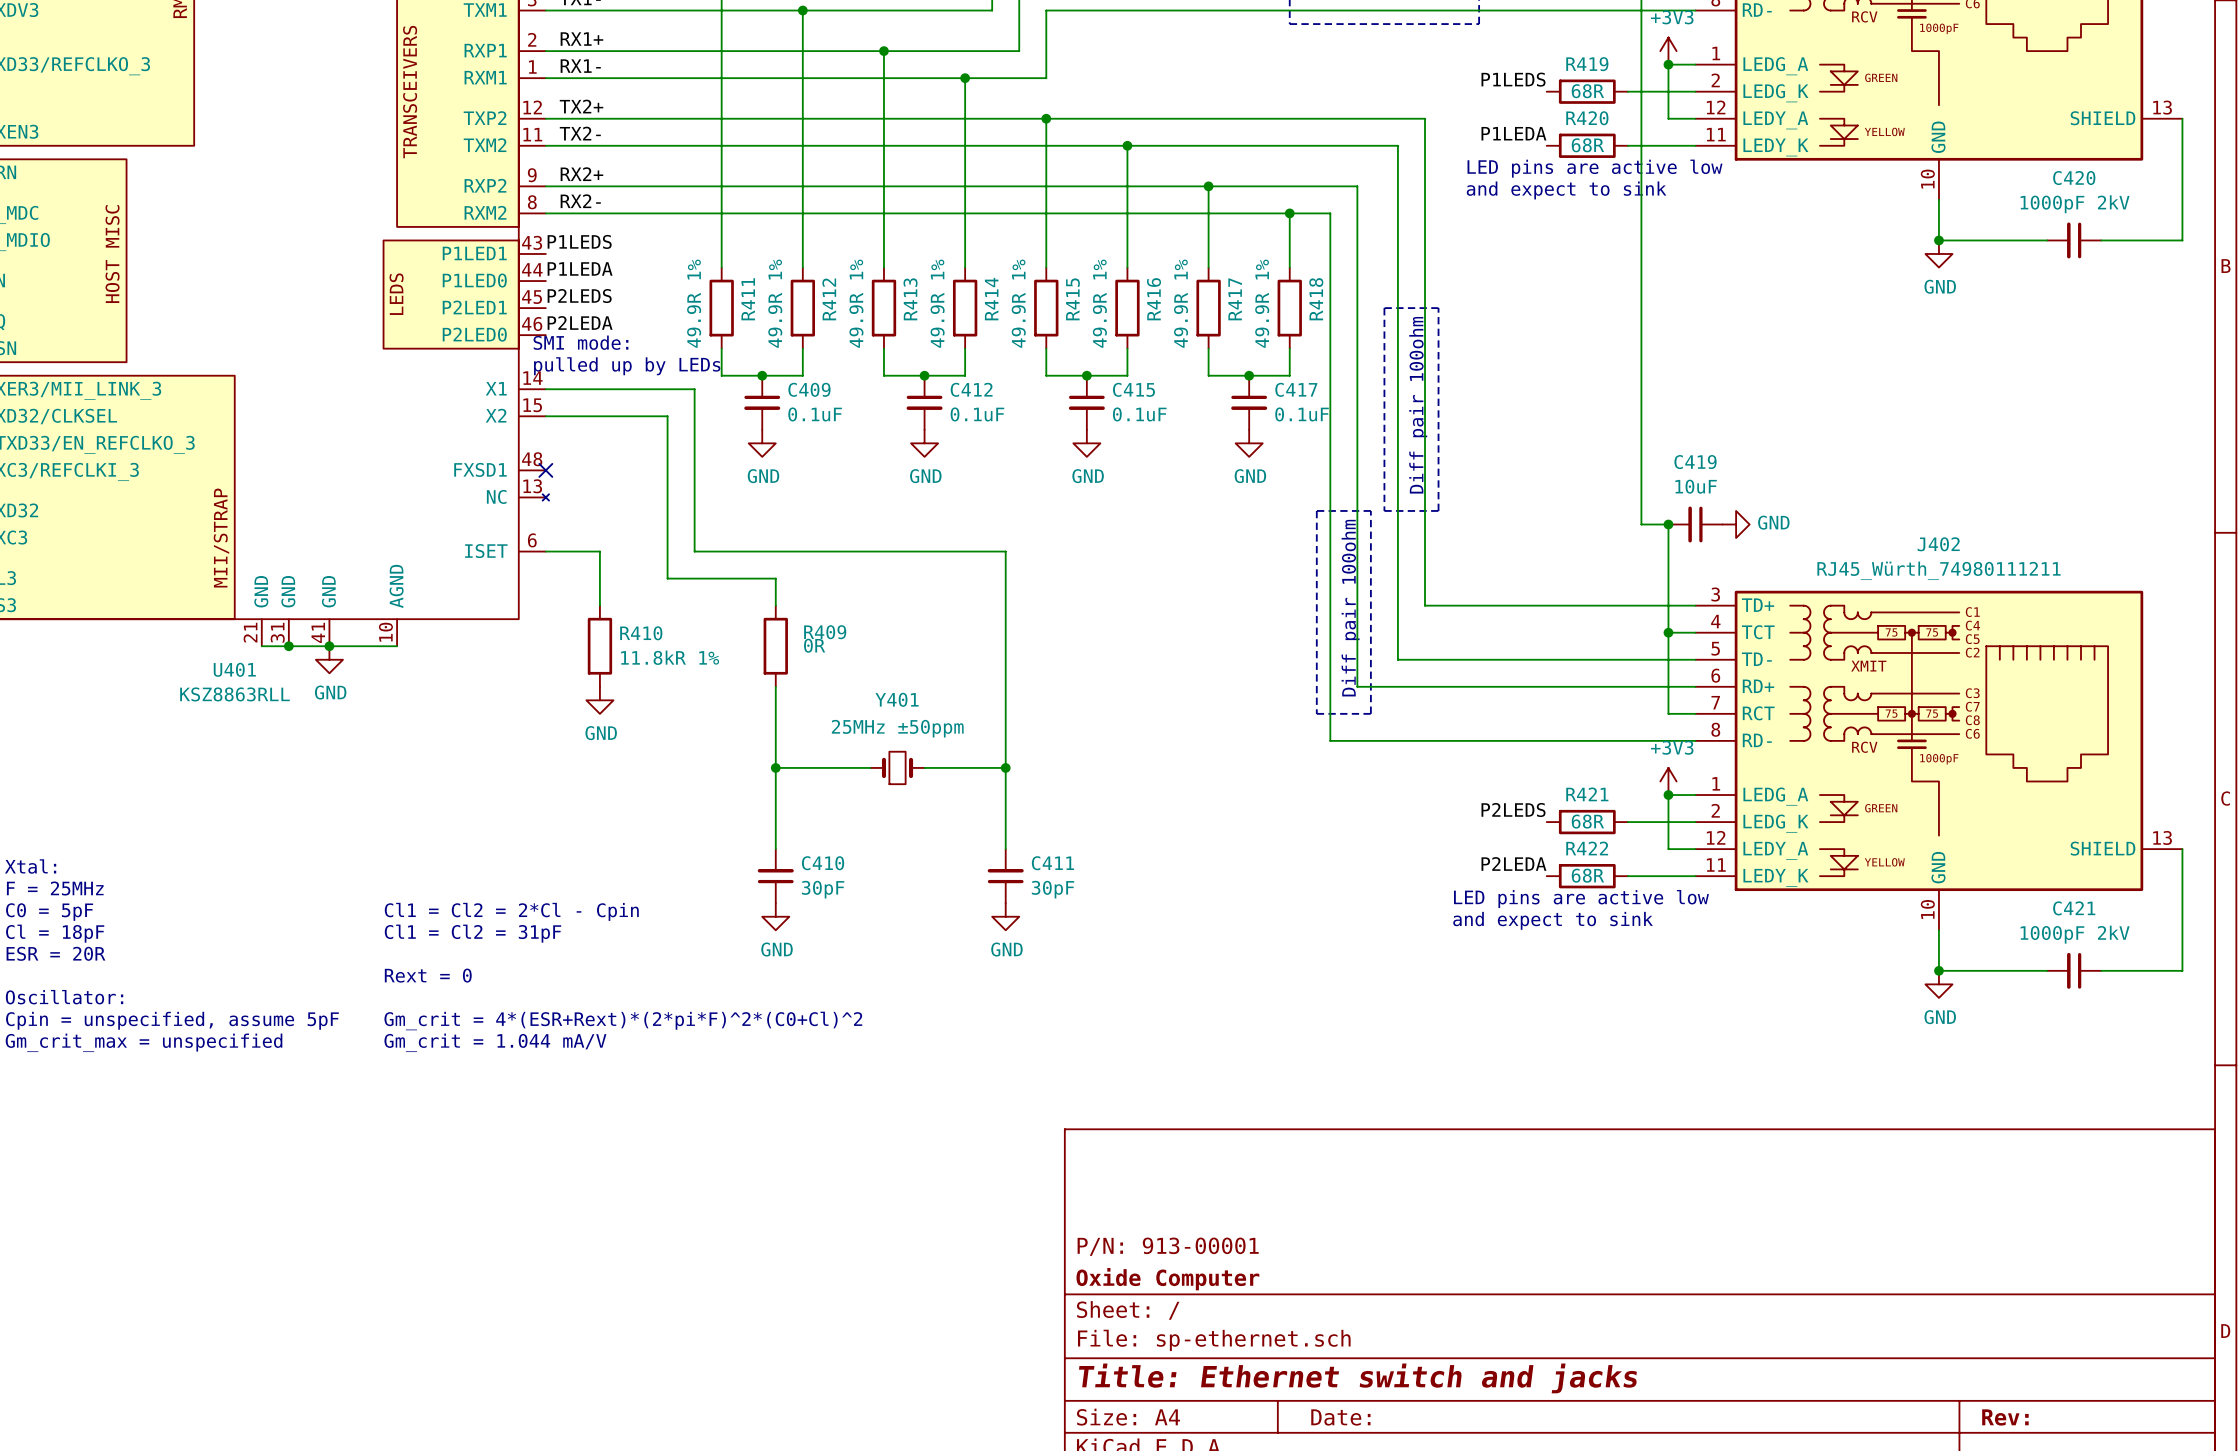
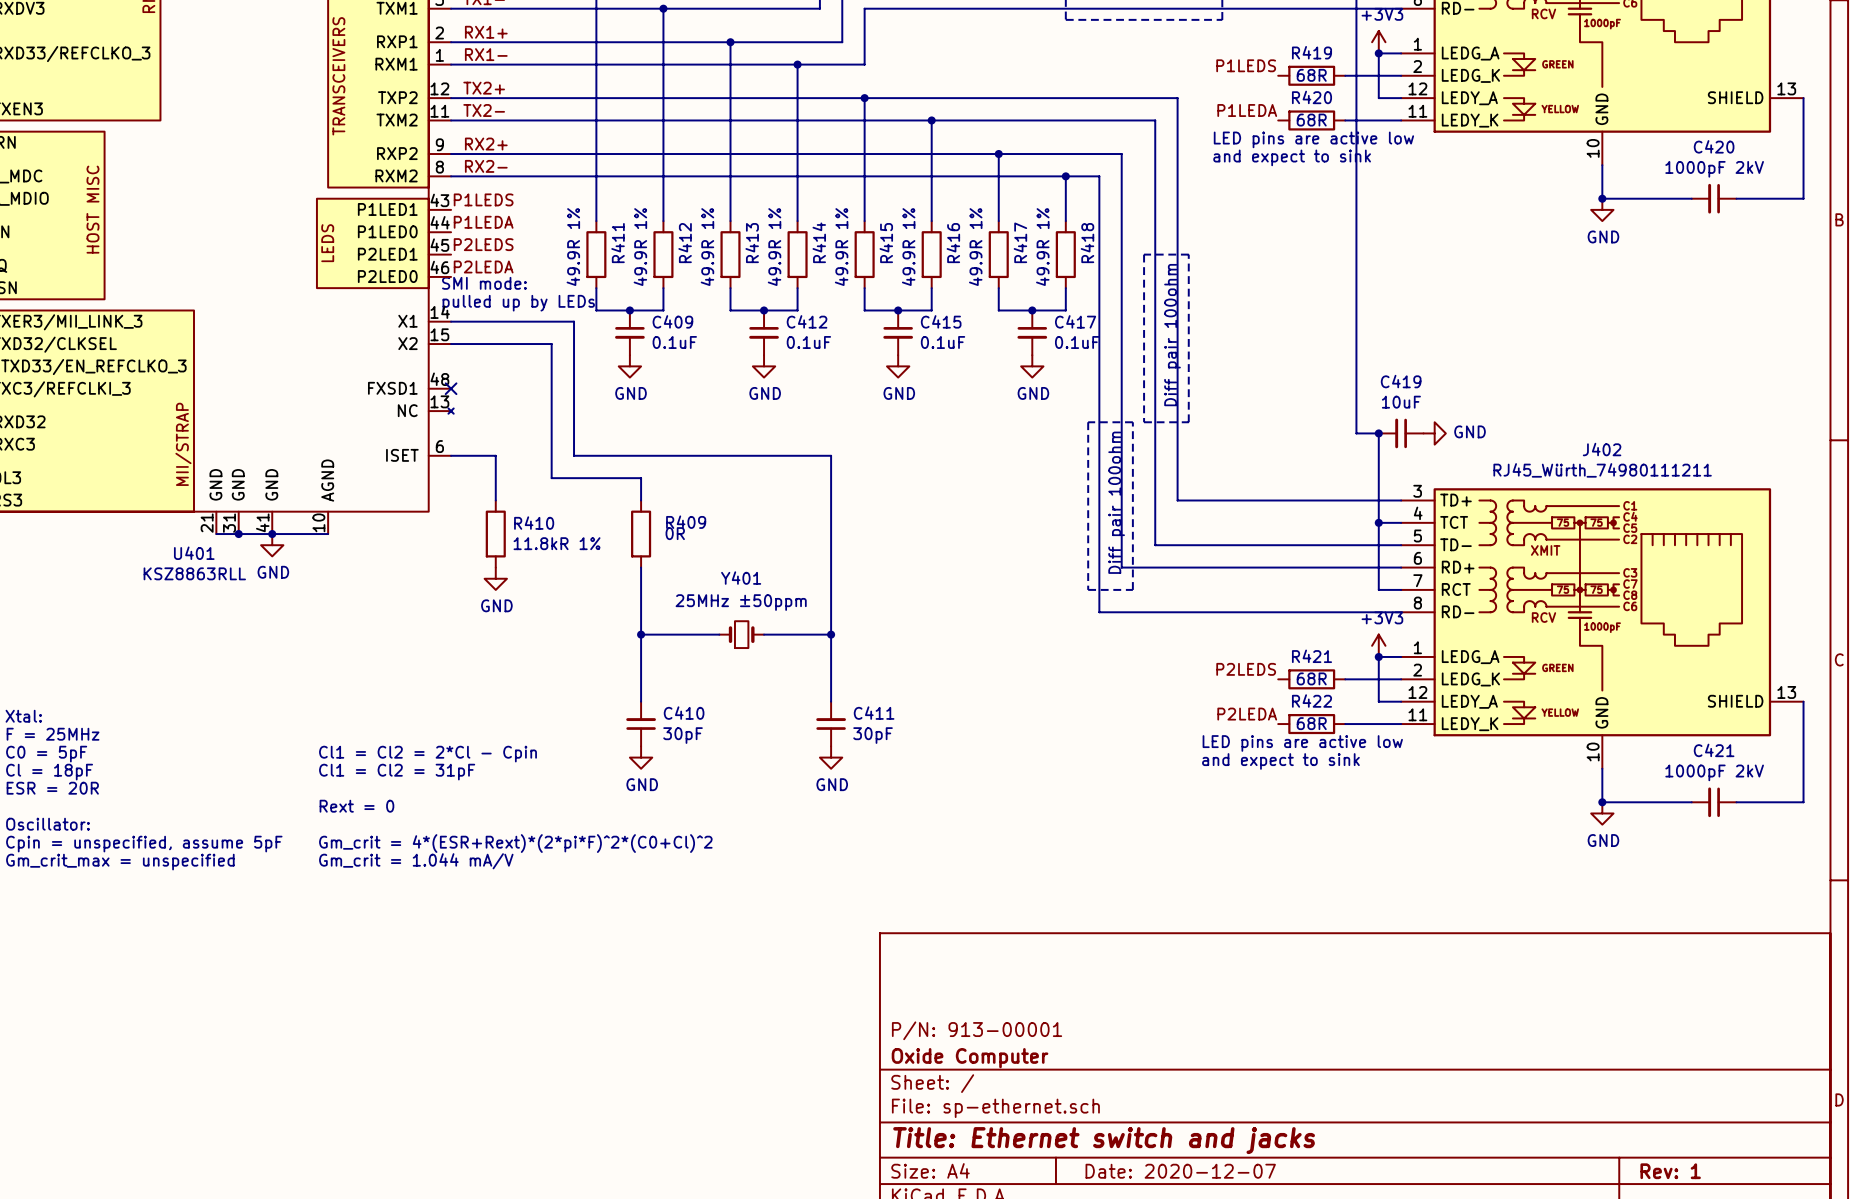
title block: Date: (1340, 1417) -> Date: 2020-12-07 (1180, 1171)
title block: Rev: (2005, 1417) -> Rev: 1 (1670, 1171)

